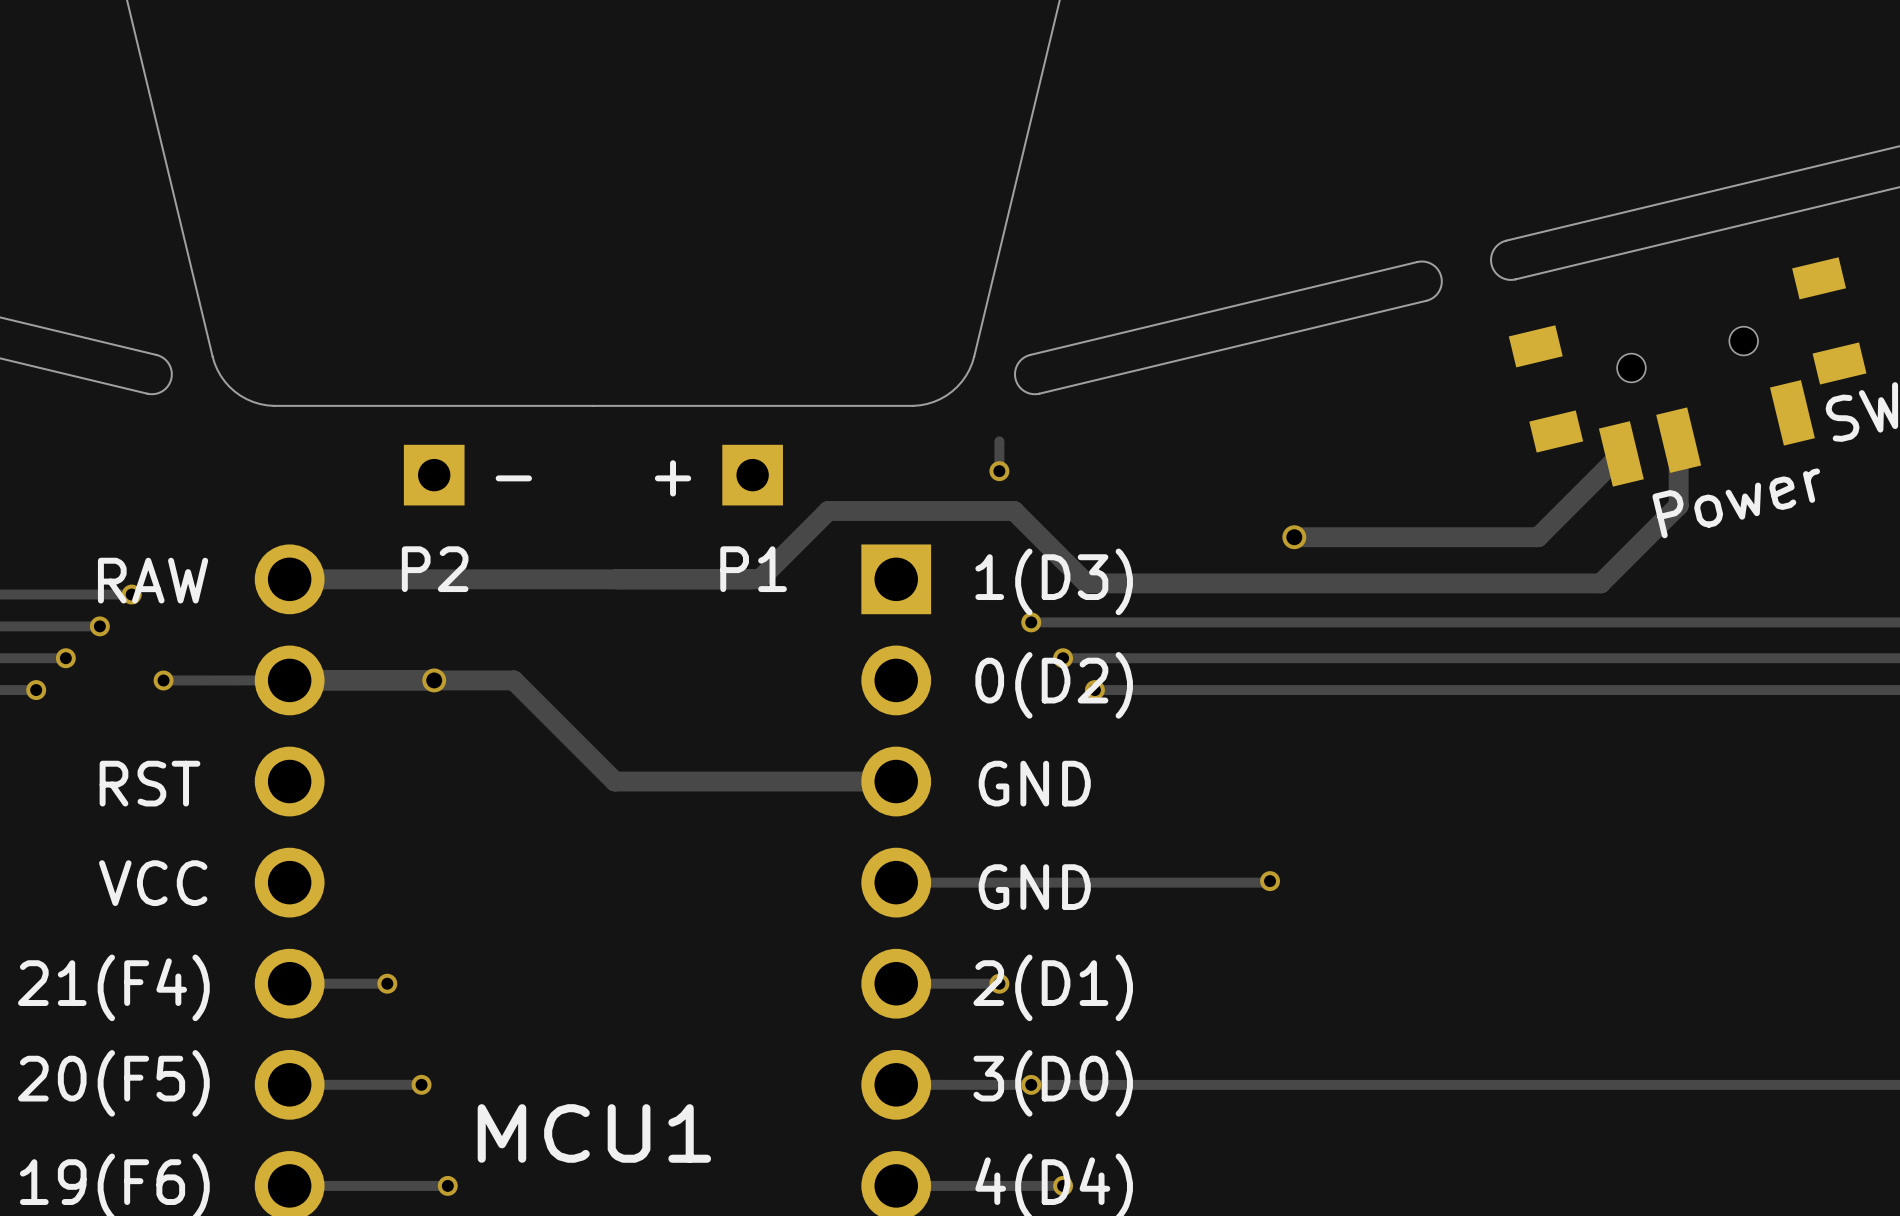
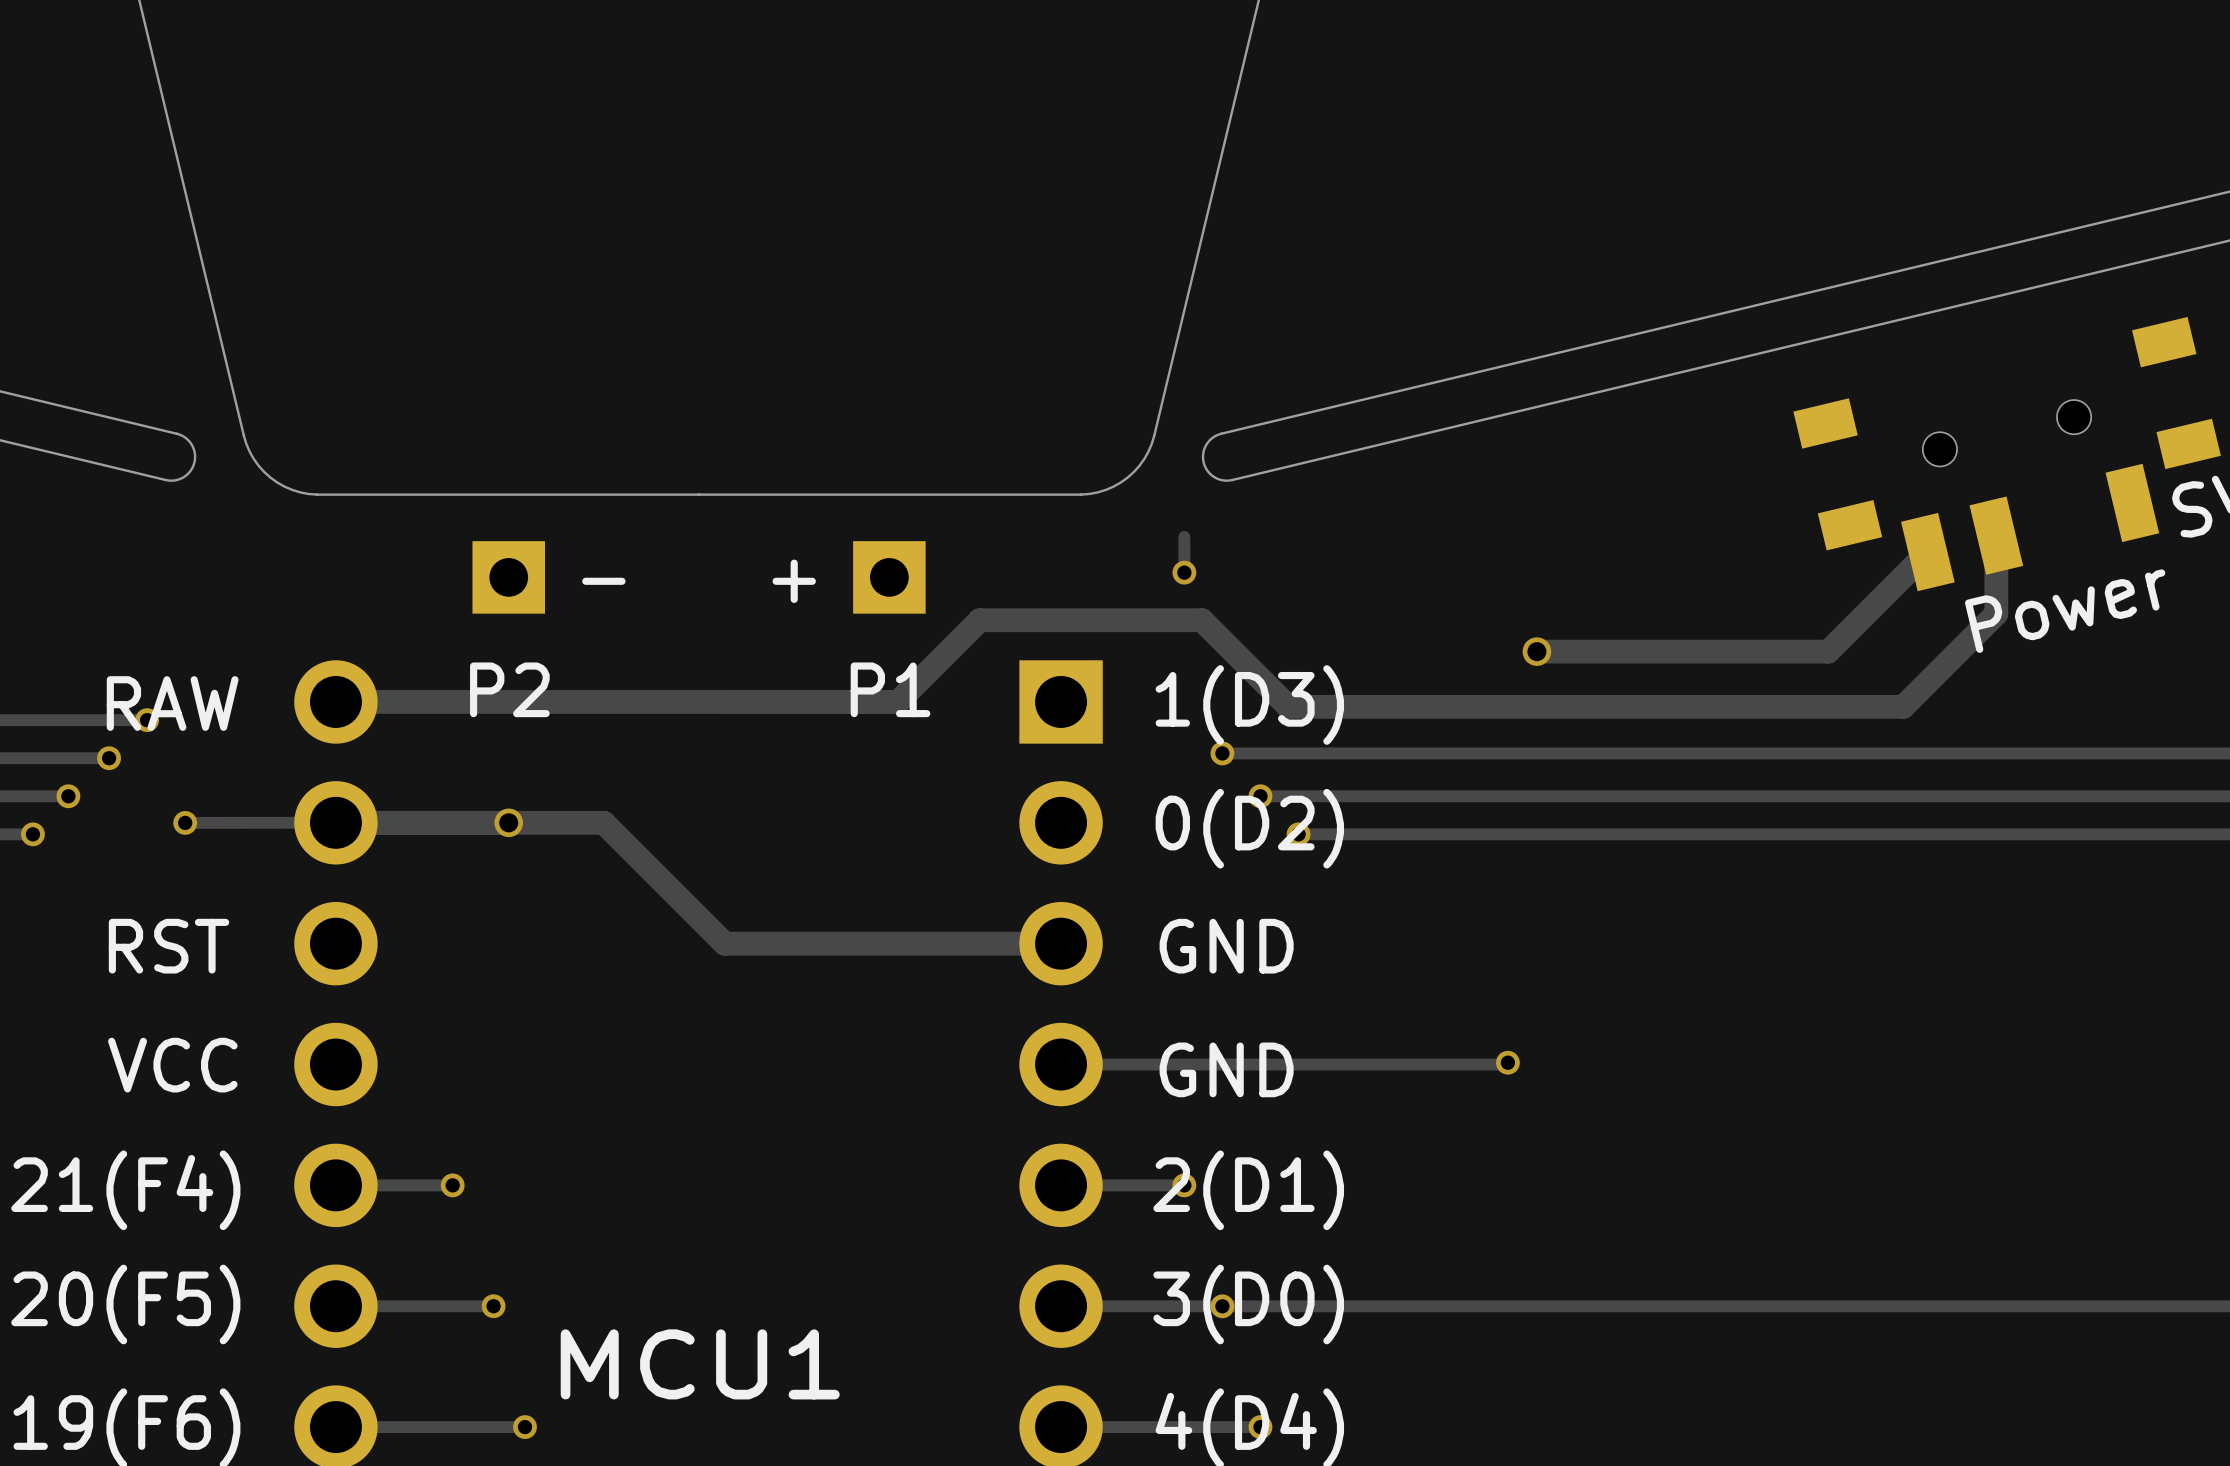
board edge: (1506, 240) (1499, 243) (1493, 249) (1491, 256) (1491, 264) (1494, 271) (1500, 277) (1507, 279) (1515, 279) -> (1790, 297) (1683, 322)
board edge: (1417, 262) (1426, 262) (1433, 265) (1441, 276) (1439, 290) (1435, 296) (1426, 300) -> (1801, 343) (1694, 368)

